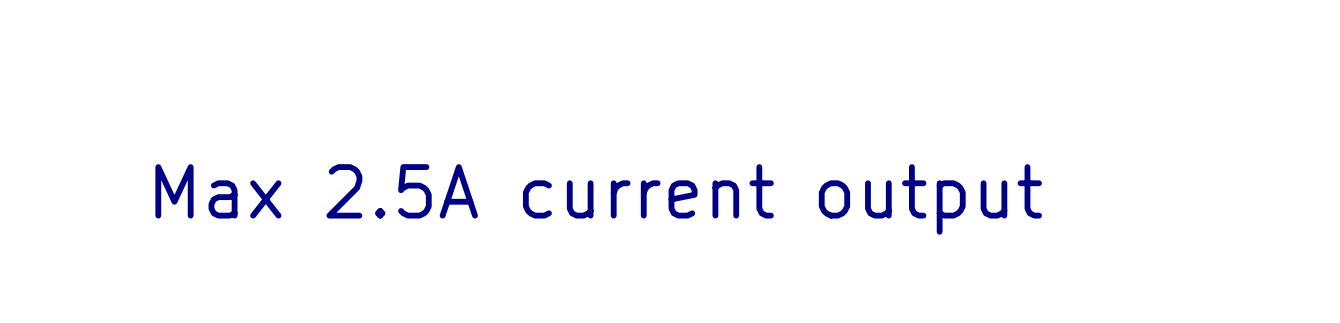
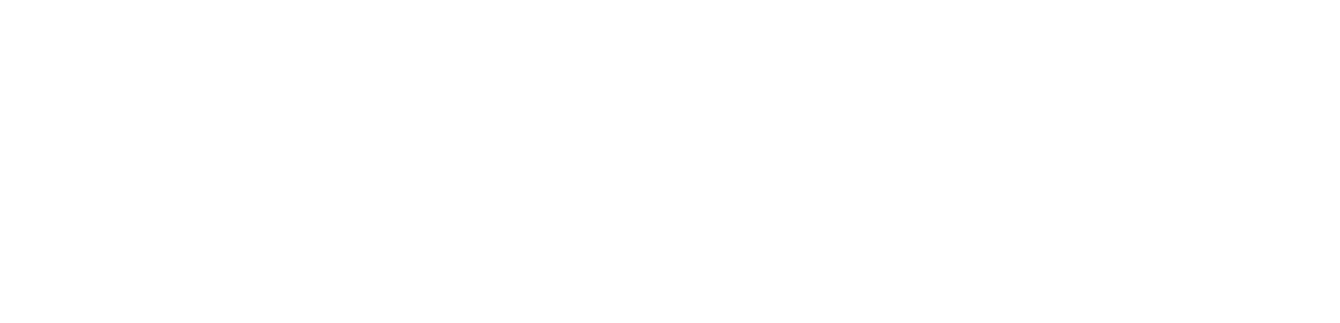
text: Max 2.5A current output (598, 199) -> none

